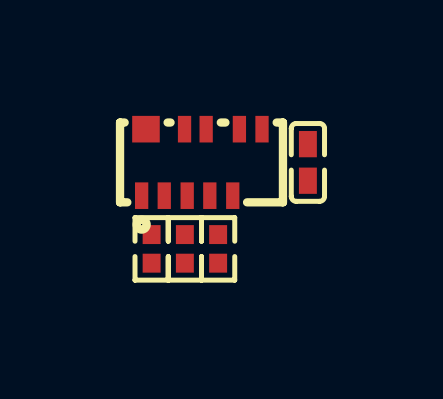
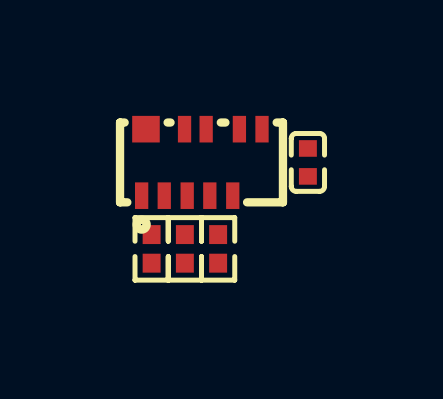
part footprint: [288, 121, 328, 204] -> [288, 131, 328, 194]

